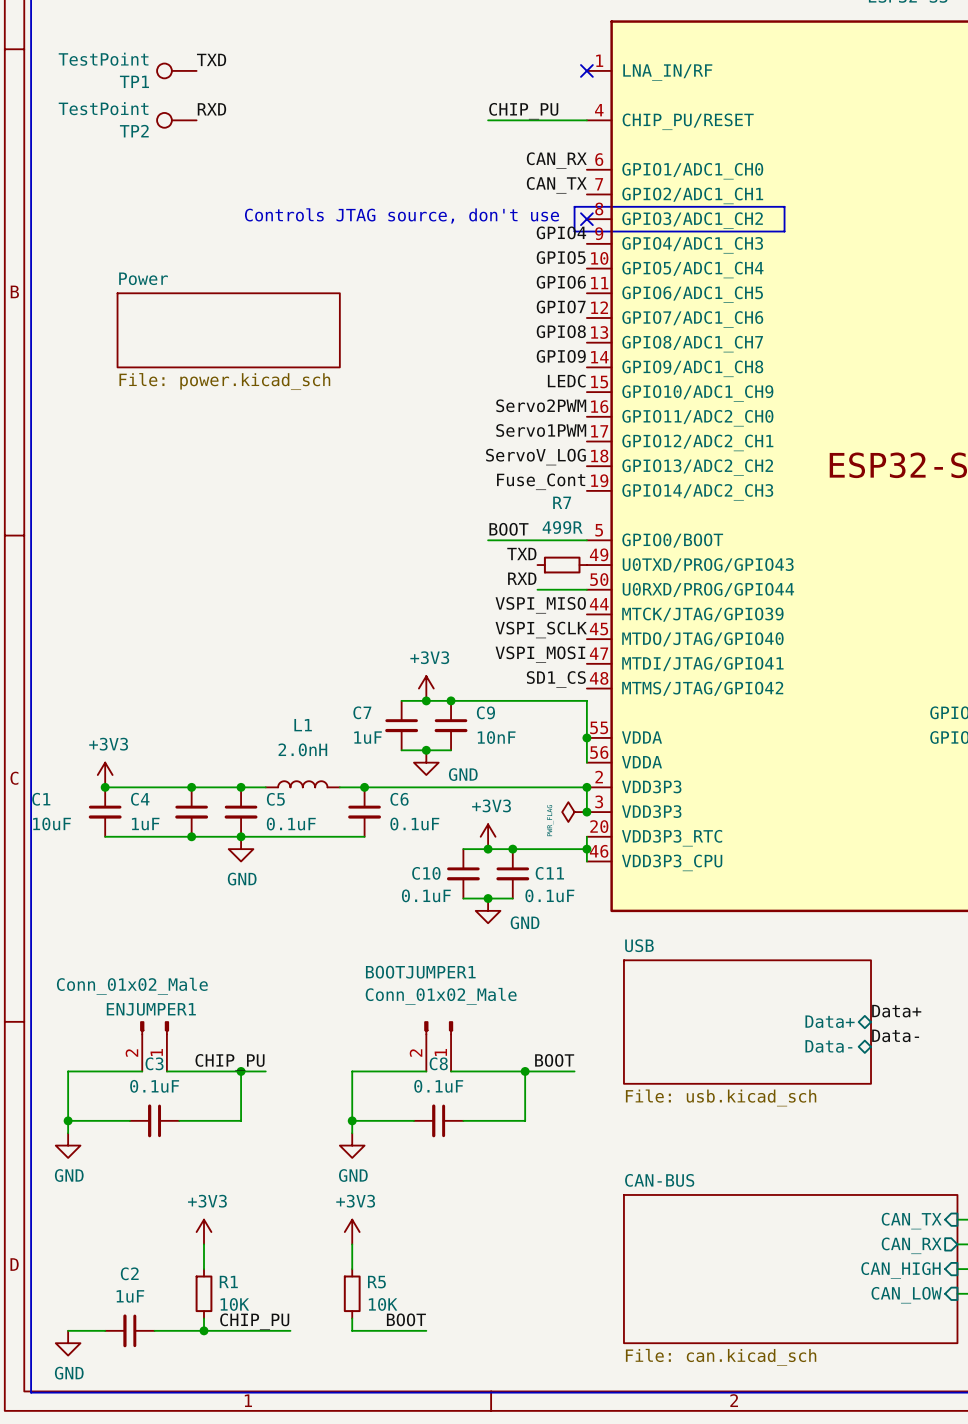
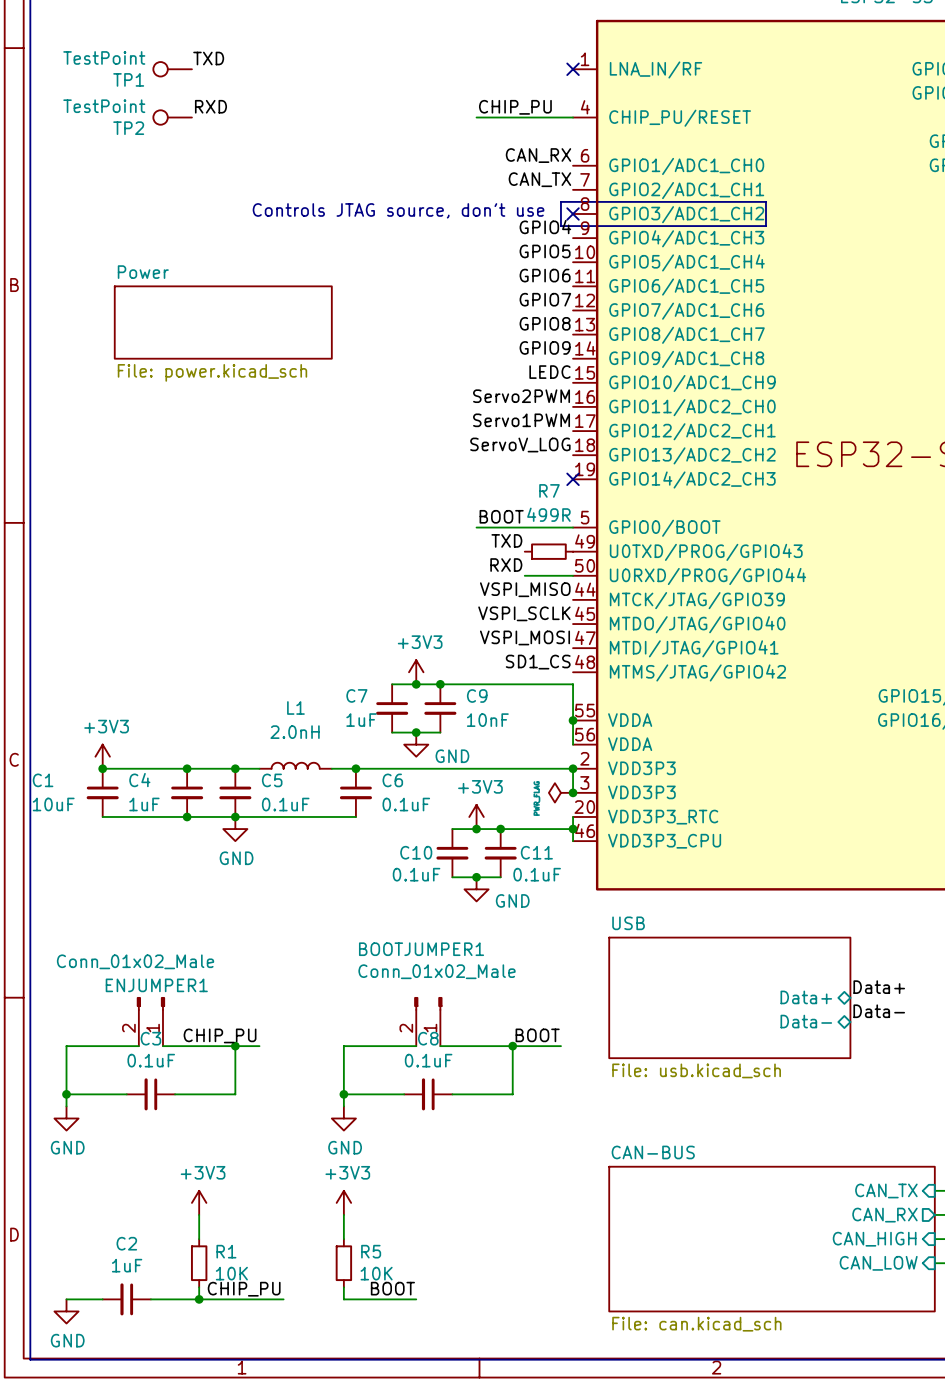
label: Fuse_Cont (541, 481) -> none
no-connect mark: none -> (573, 479)

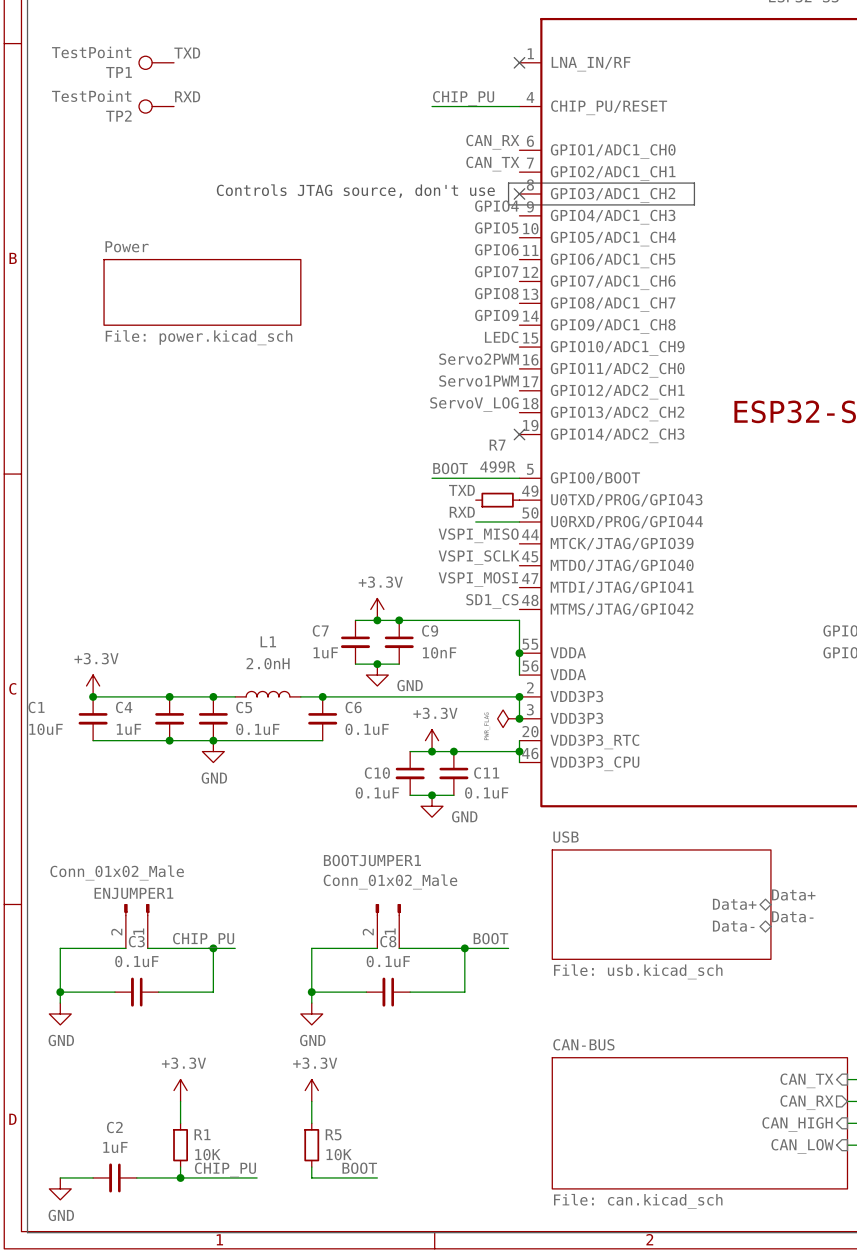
power symbol: +3V3 (416, 672) -> +3.3V (377, 609)
power symbol: +3V3 (102, 756) -> +3.3V (93, 685)
power symbol: +3V3 (476, 816) -> +3.3V (432, 740)
power symbol: +3V3 (199, 1202) -> +3.3V (180, 1090)
power symbol: +3V3 (343, 1202) -> +3.3V (311, 1090)

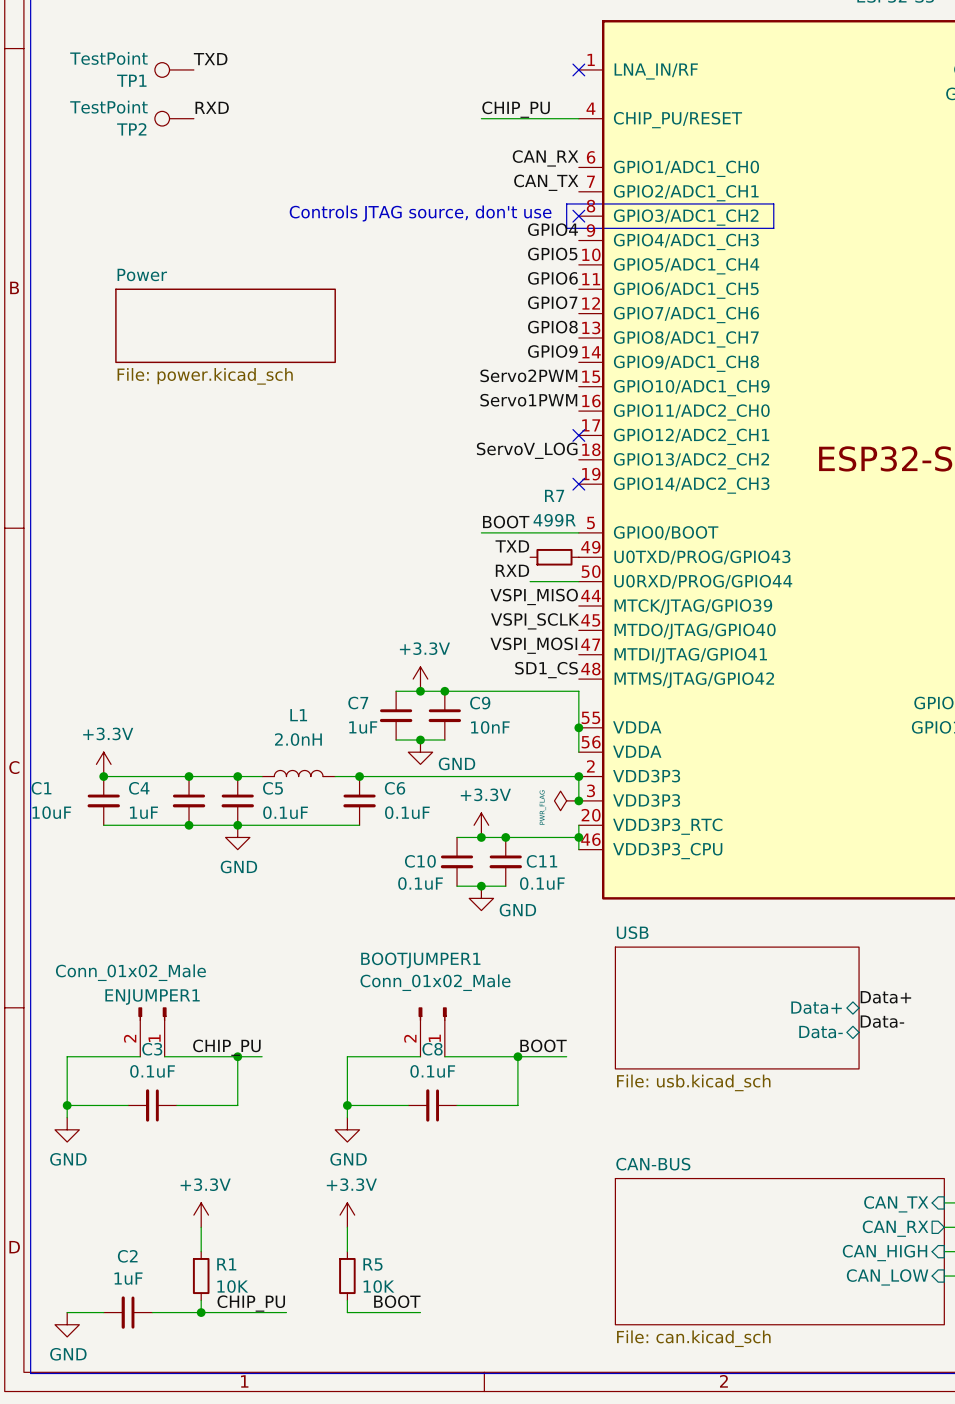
label: LEDC (501, 337) -> Servo2PWM (528, 375)
label: Servo2PWM (479, 359) -> Servo1PWM (528, 400)
label: Servo1PWM (479, 381) -> none
no-connect mark: none -> (578, 435)

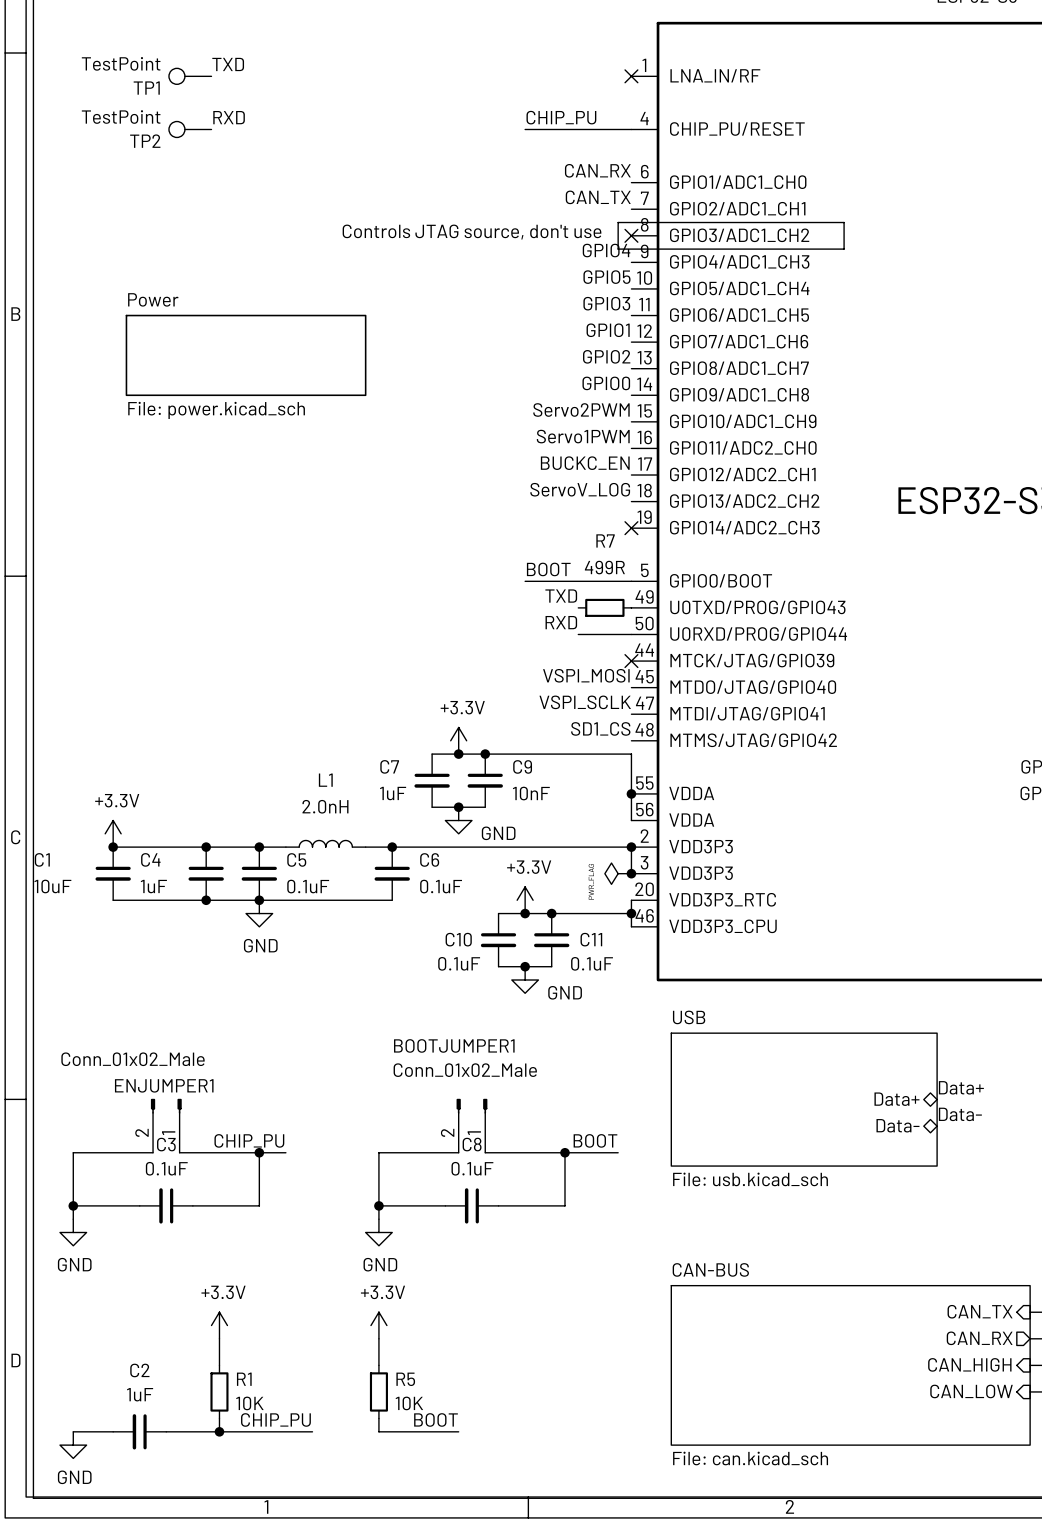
label: GPIO6 (552, 278) -> GPIO3 (606, 303)
label: GPIO7 (552, 302) -> GPIO1 (608, 330)
label: GPIO8 (552, 327) -> GPIO2 (606, 356)
label: GPIO9 (552, 351) -> GPIO0 (606, 383)
label: none -> BUCKC_EN (585, 463)
no-connect mark: (578, 435) -> none
label: VSPI_MISO (534, 596) -> none
no-connect mark: none -> (631, 661)
label: VSPI_SCLK (535, 621) -> VSPI_MOSI (586, 675)
label: VSPI_MOSI (533, 645) -> VSPI_SCLK (585, 702)

